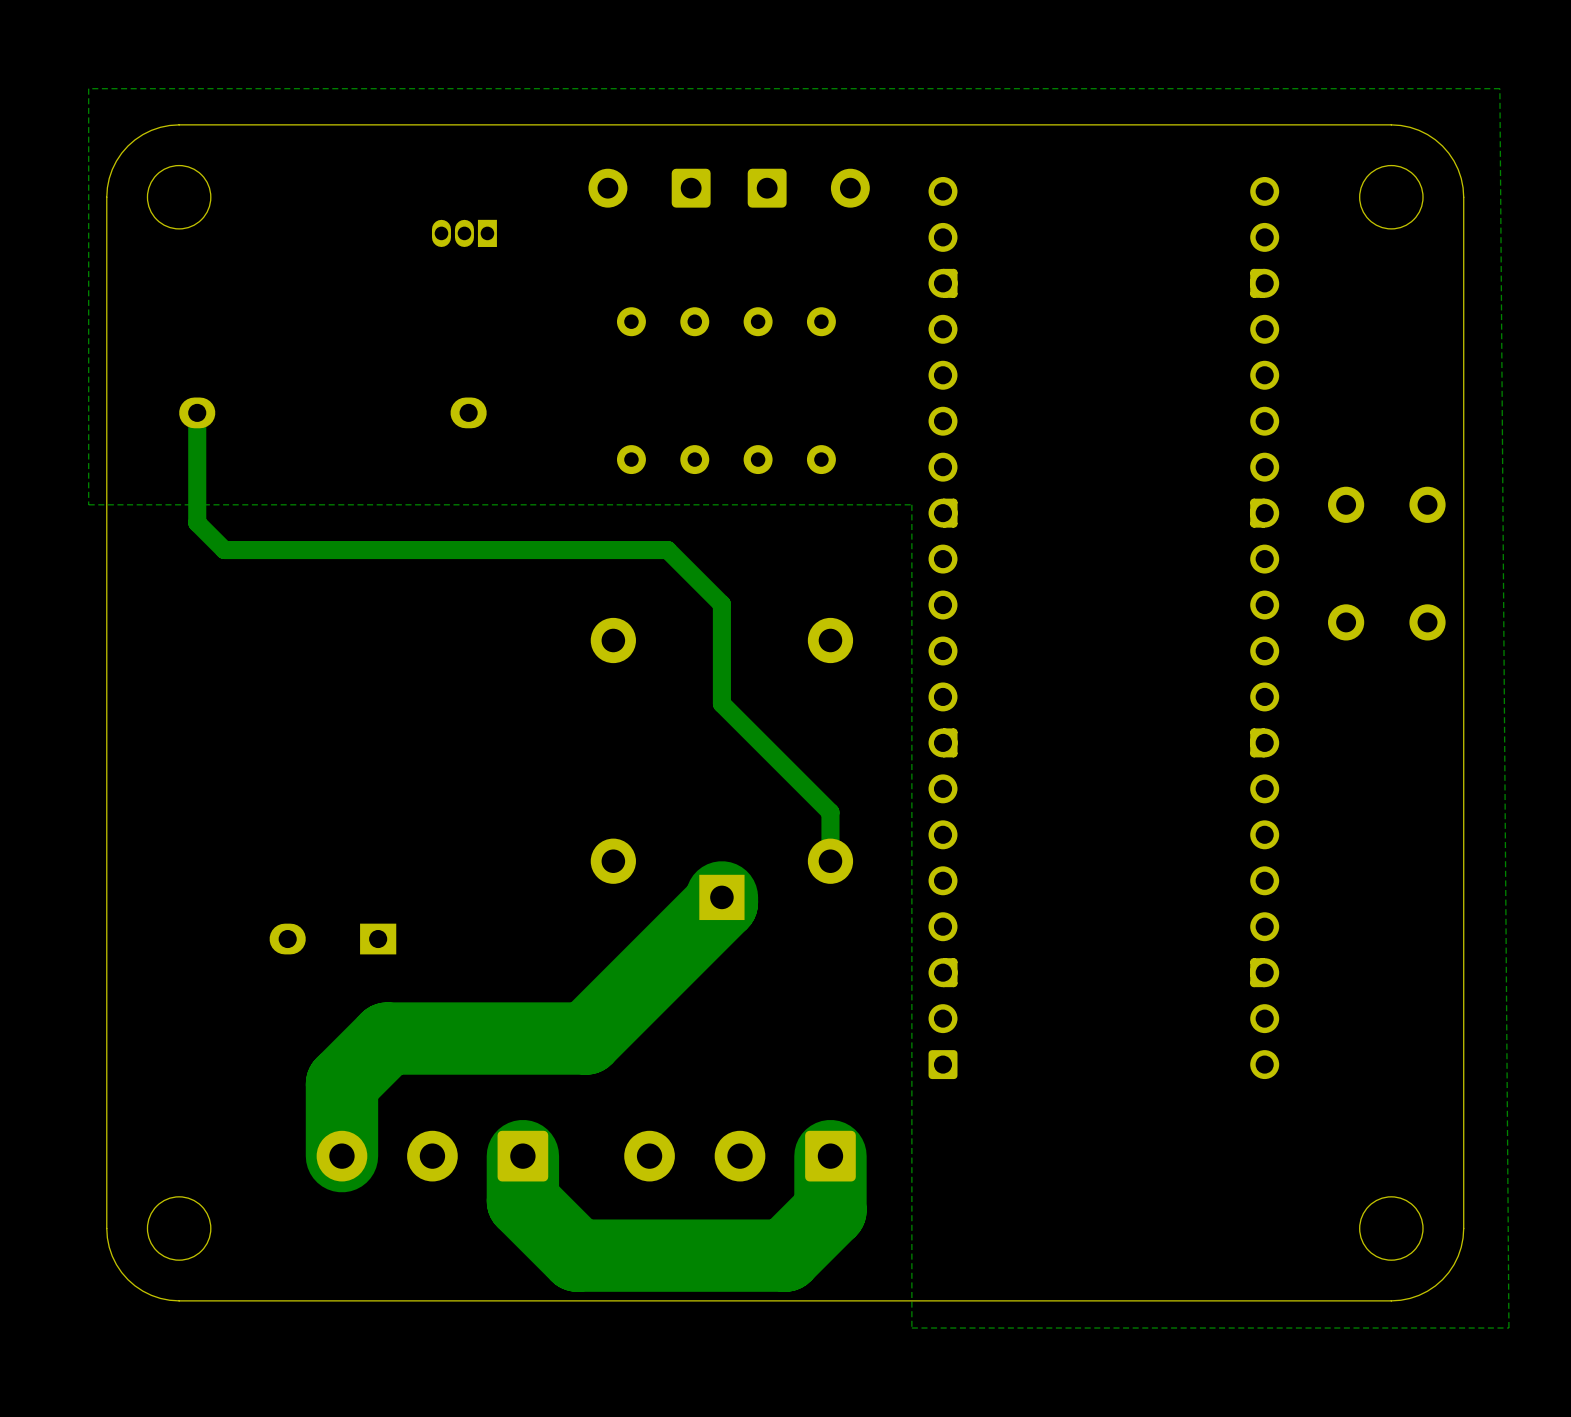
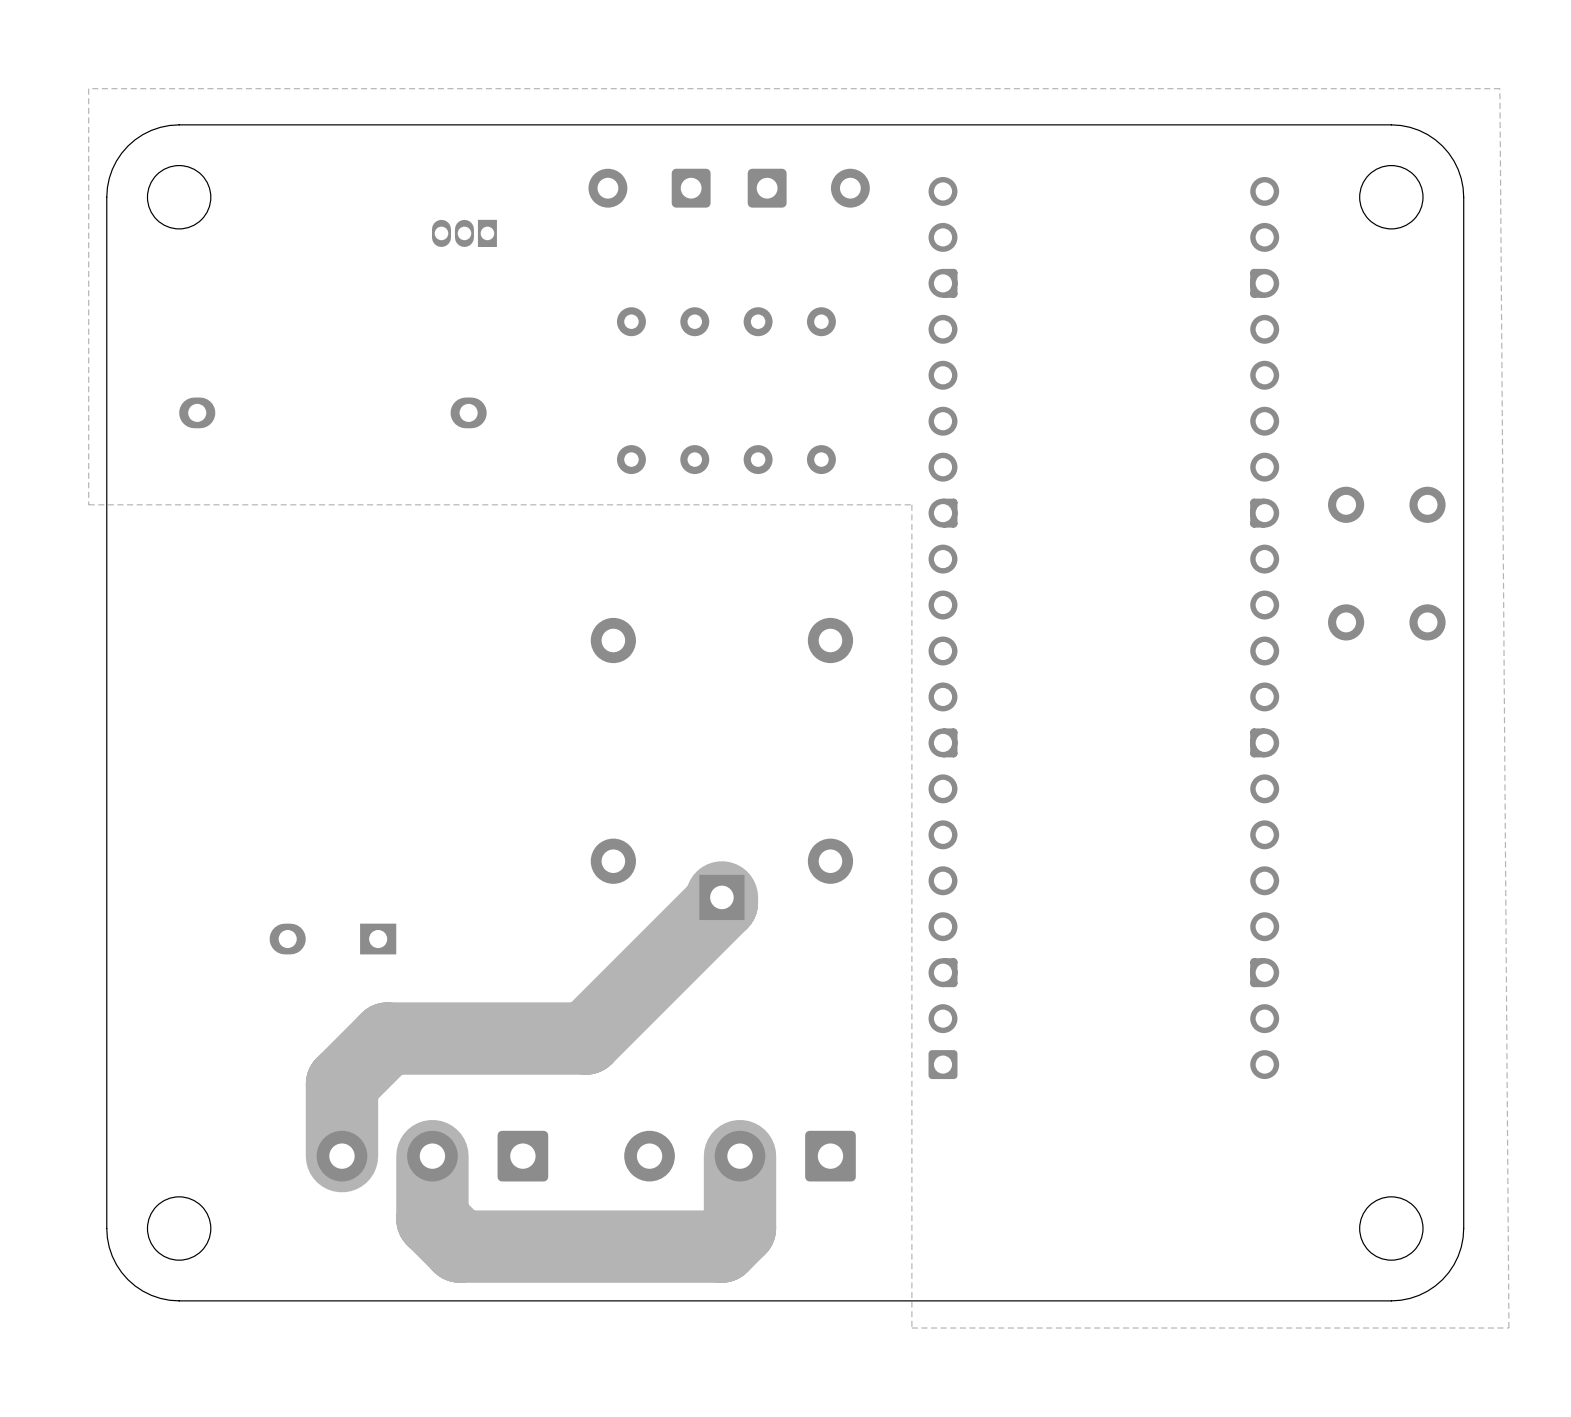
track: (197, 412) (197, 522) (224, 550) (667, 550) (721, 604) (721, 703) (830, 812) (830, 861) -> none
track: none -> (740, 1156) (740, 1228) (721, 1246) (459, 1246) (432, 1219) (432, 1156)
track: (830, 1156) (830, 1210) (785, 1255) (577, 1255) (522, 1201) (522, 1156) -> none

